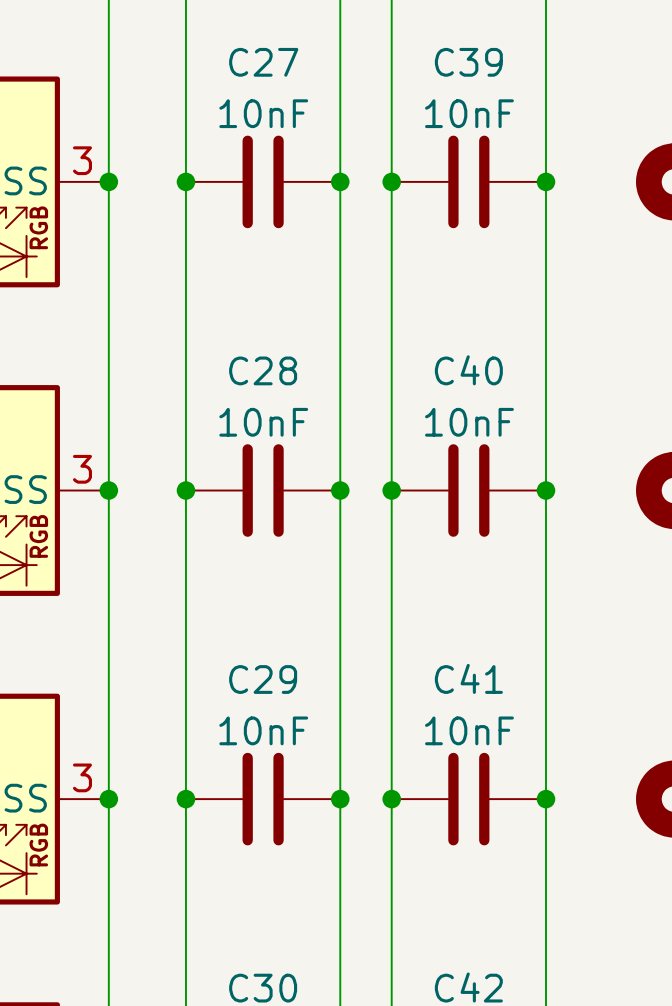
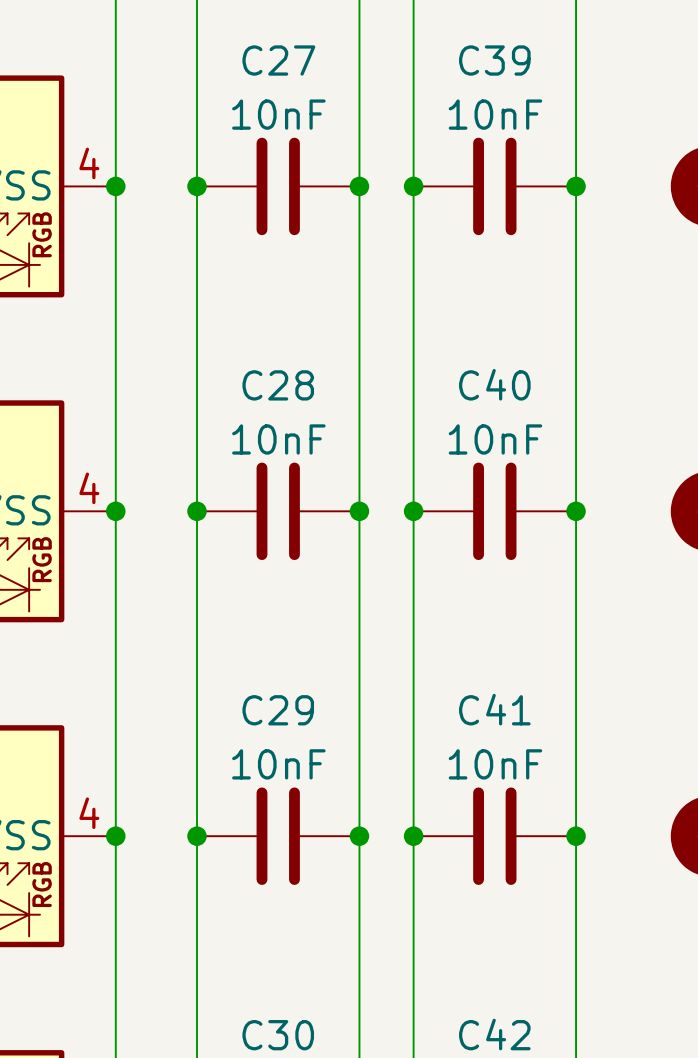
part pin number: 3 (82, 160) -> 4 (89, 163)
part pin number: 3 (82, 469) -> 4 (89, 488)
part pin number: 3 (82, 777) -> 4 (89, 813)

